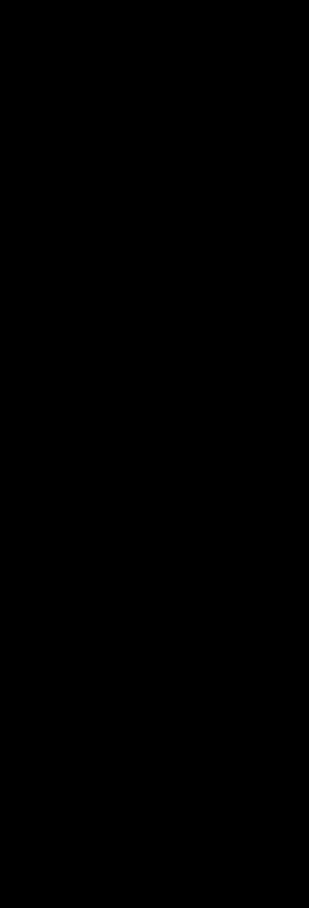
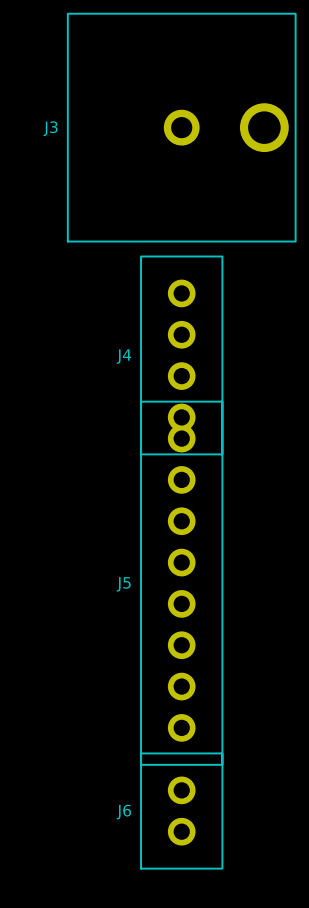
J3: none -> (181, 127)
J4: none -> (181, 355)
J5: none -> (181, 583)
J6: none -> (181, 811)

